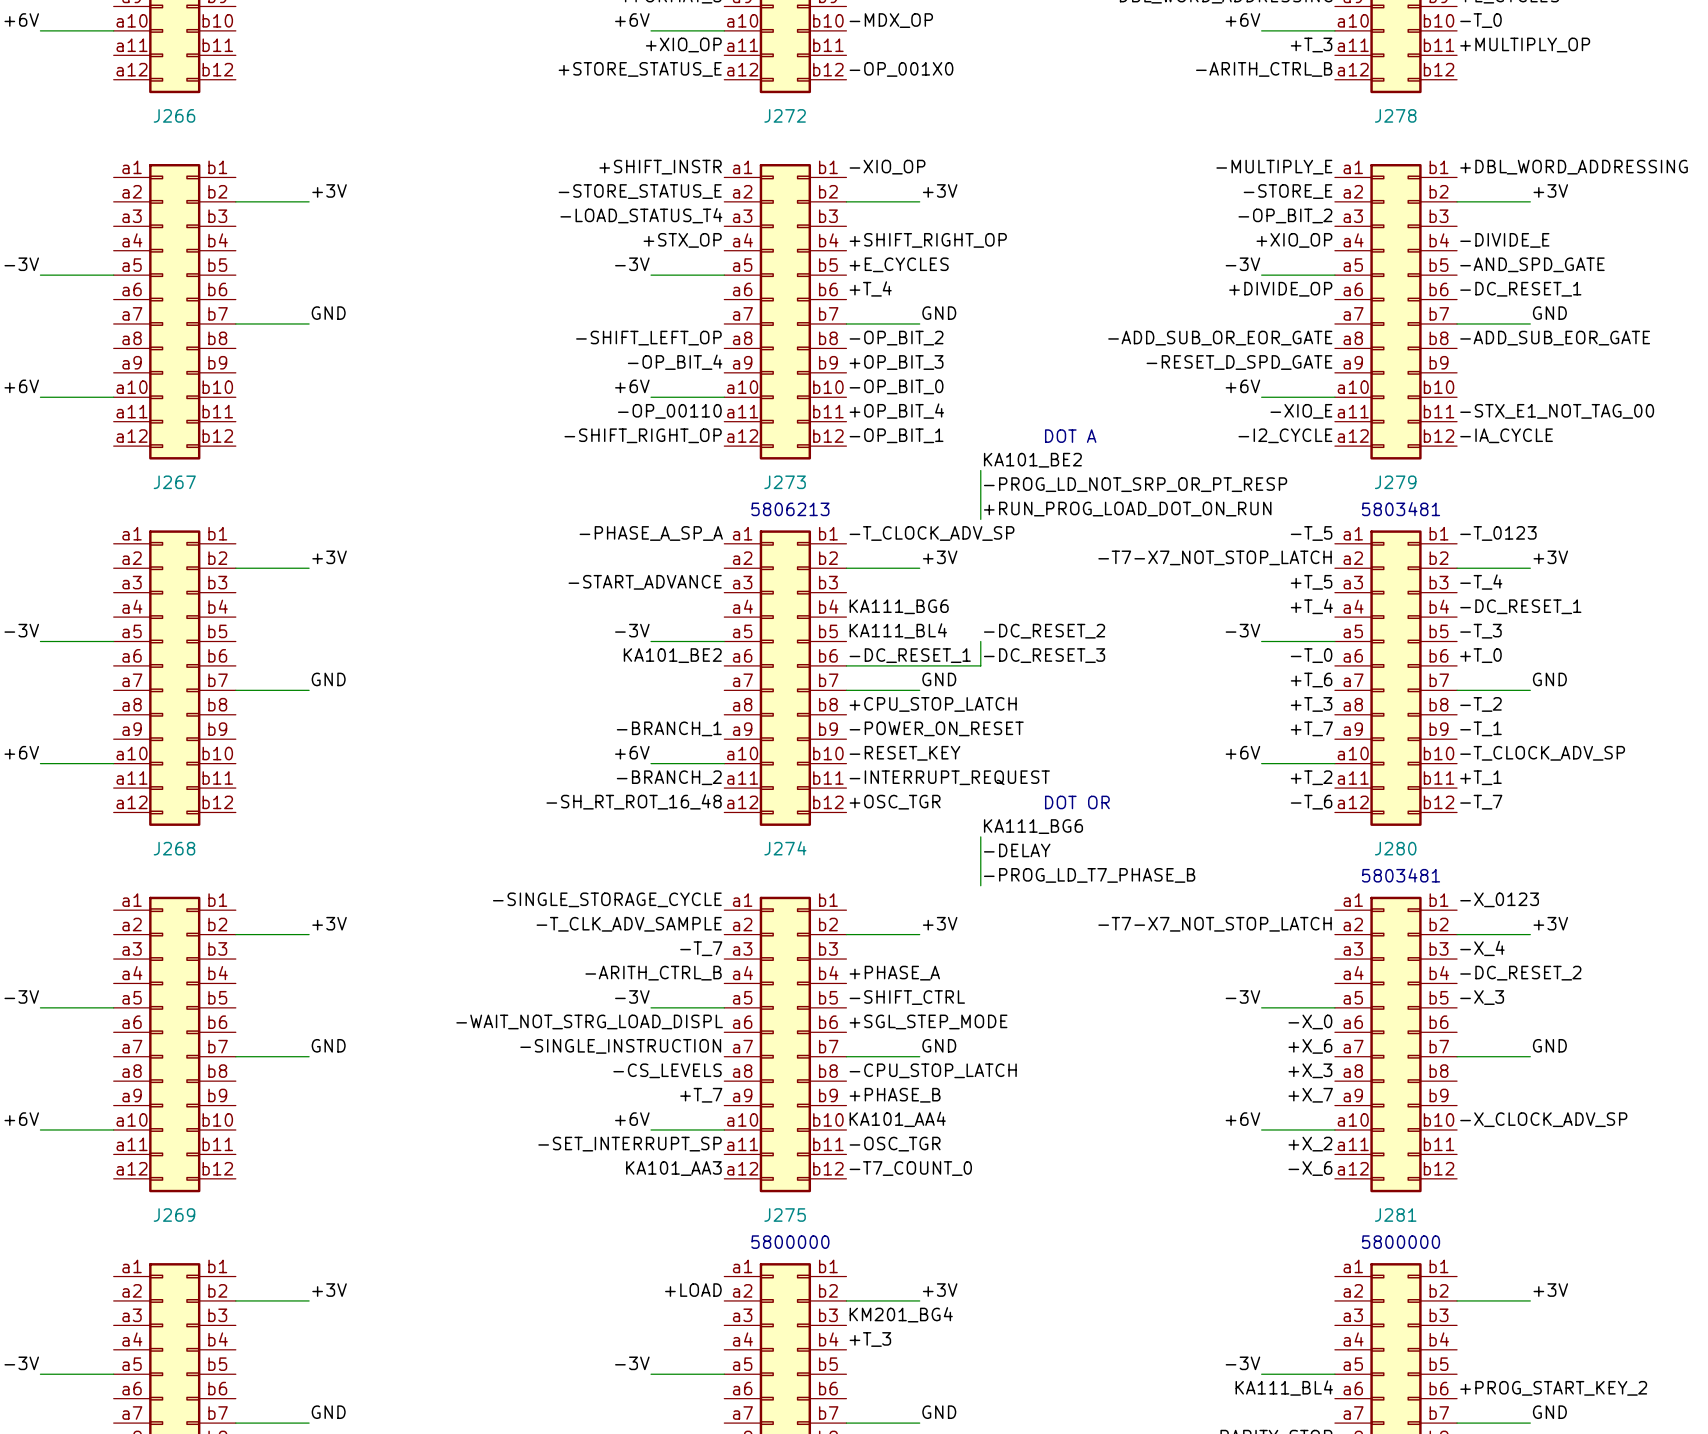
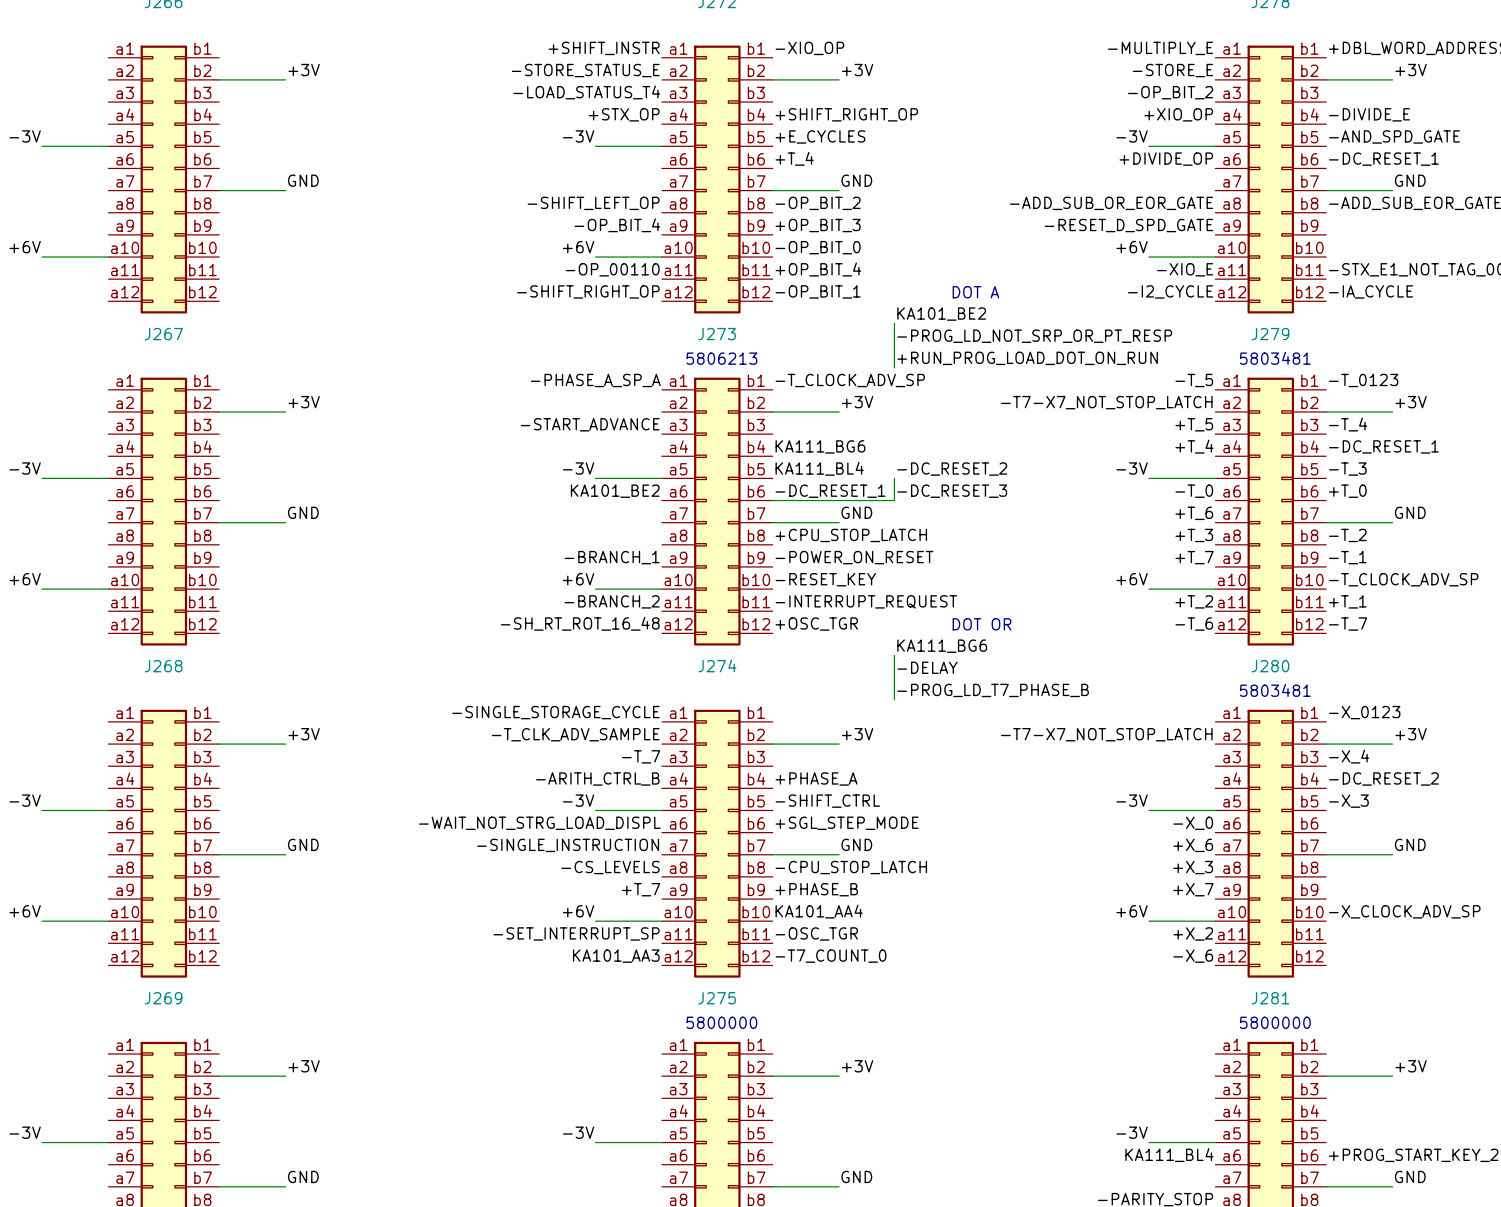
label: +LOAD (693, 1290) -> none
label: KM201_BG4 (901, 1314) -> none
label: +T_3 (870, 1339) -> none

